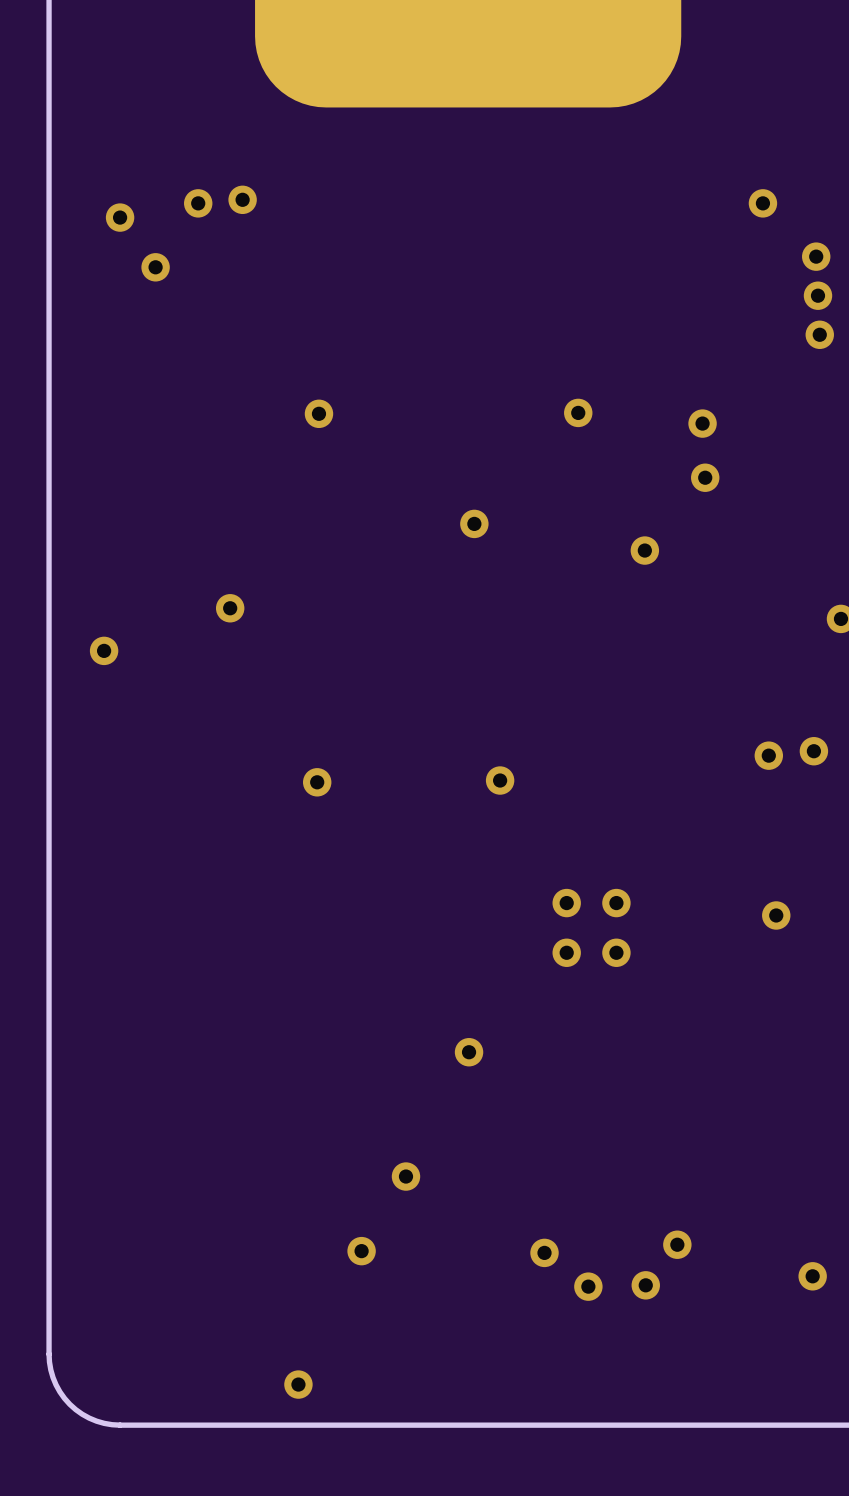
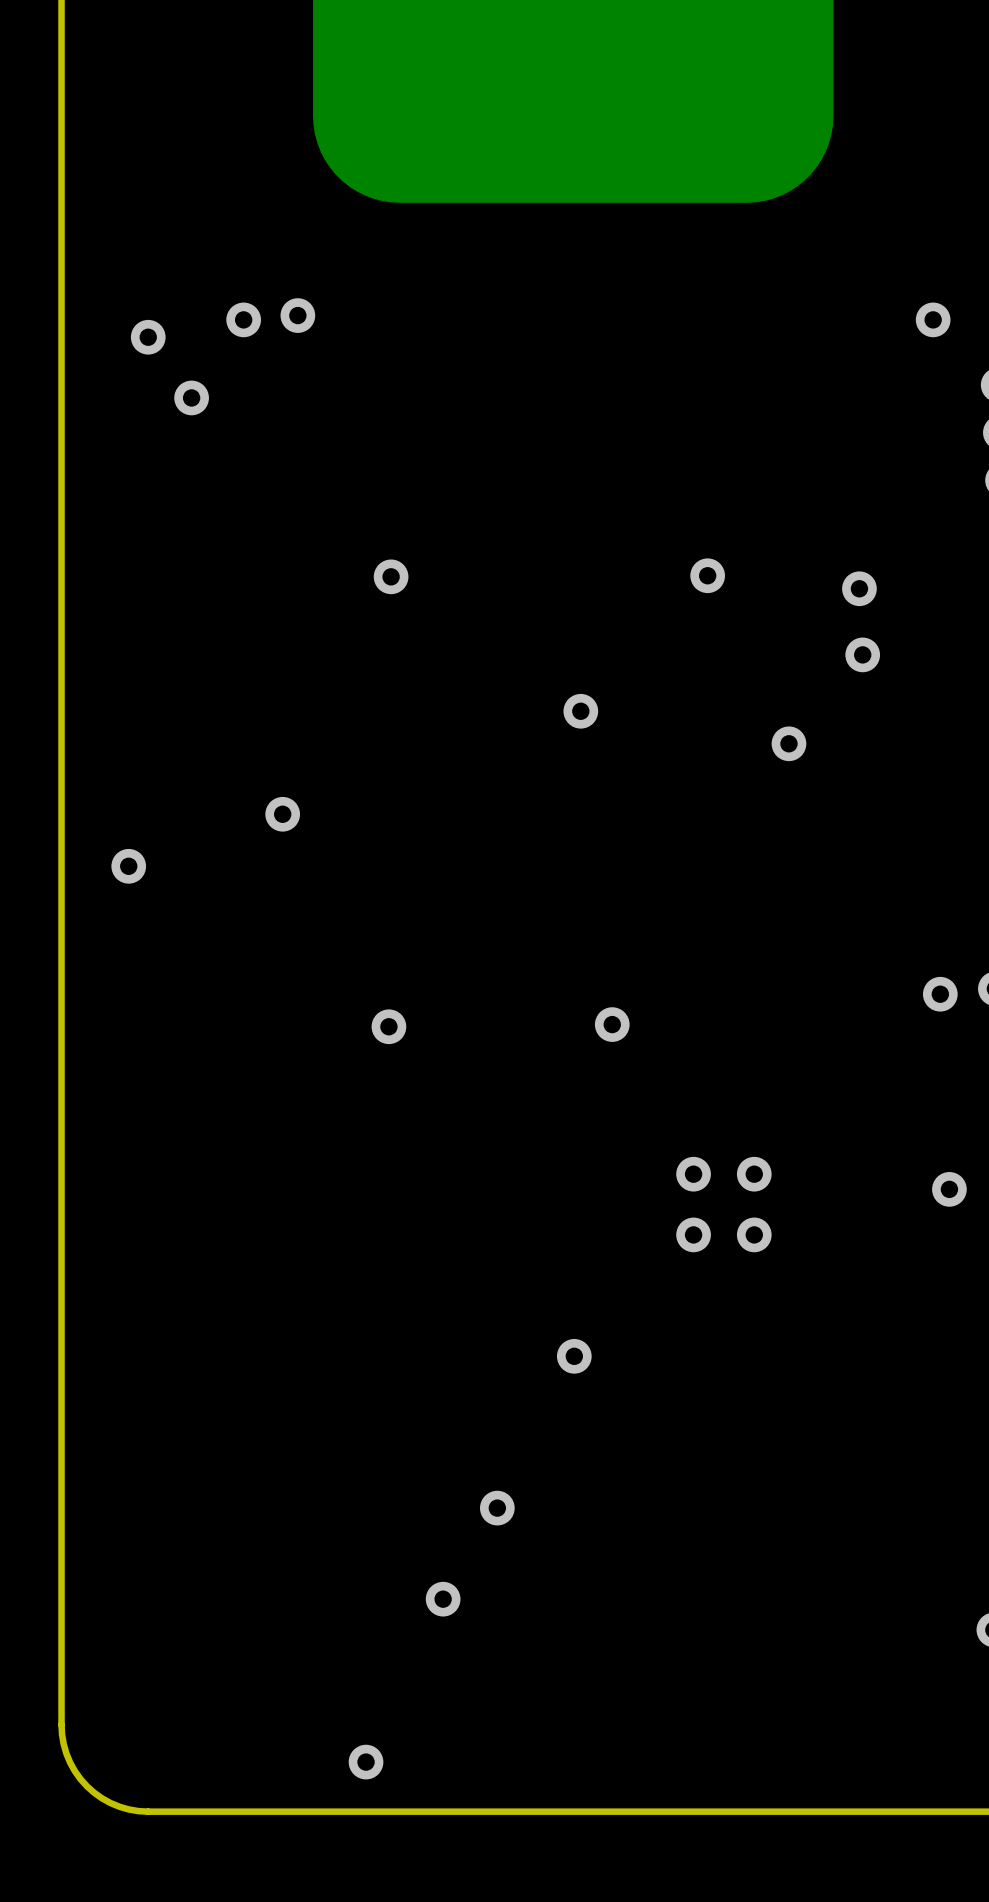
via: (677, 1244) -> none
via: (544, 1252) -> none
via: (645, 1285) -> none
via: (588, 1286) -> none

